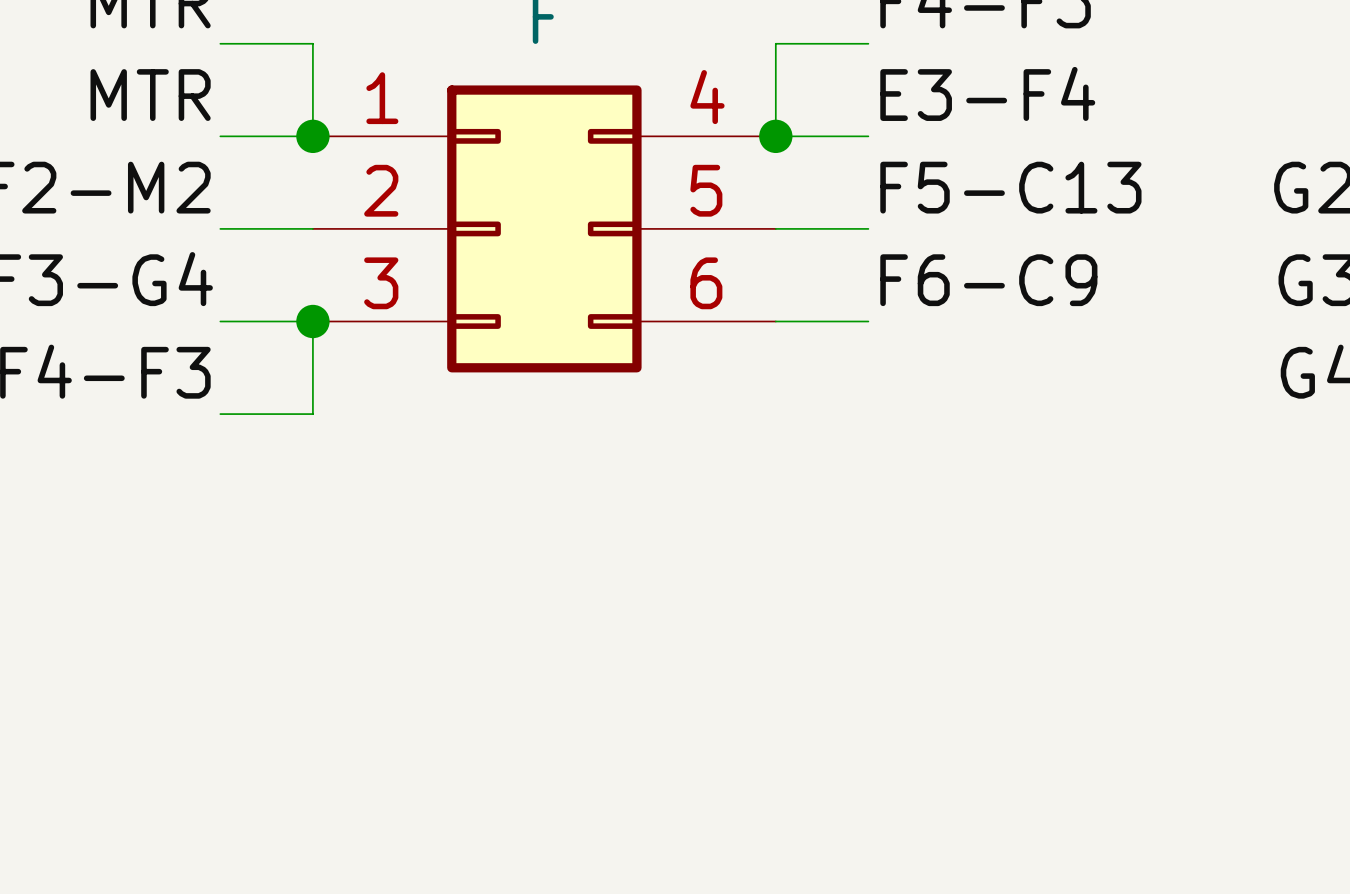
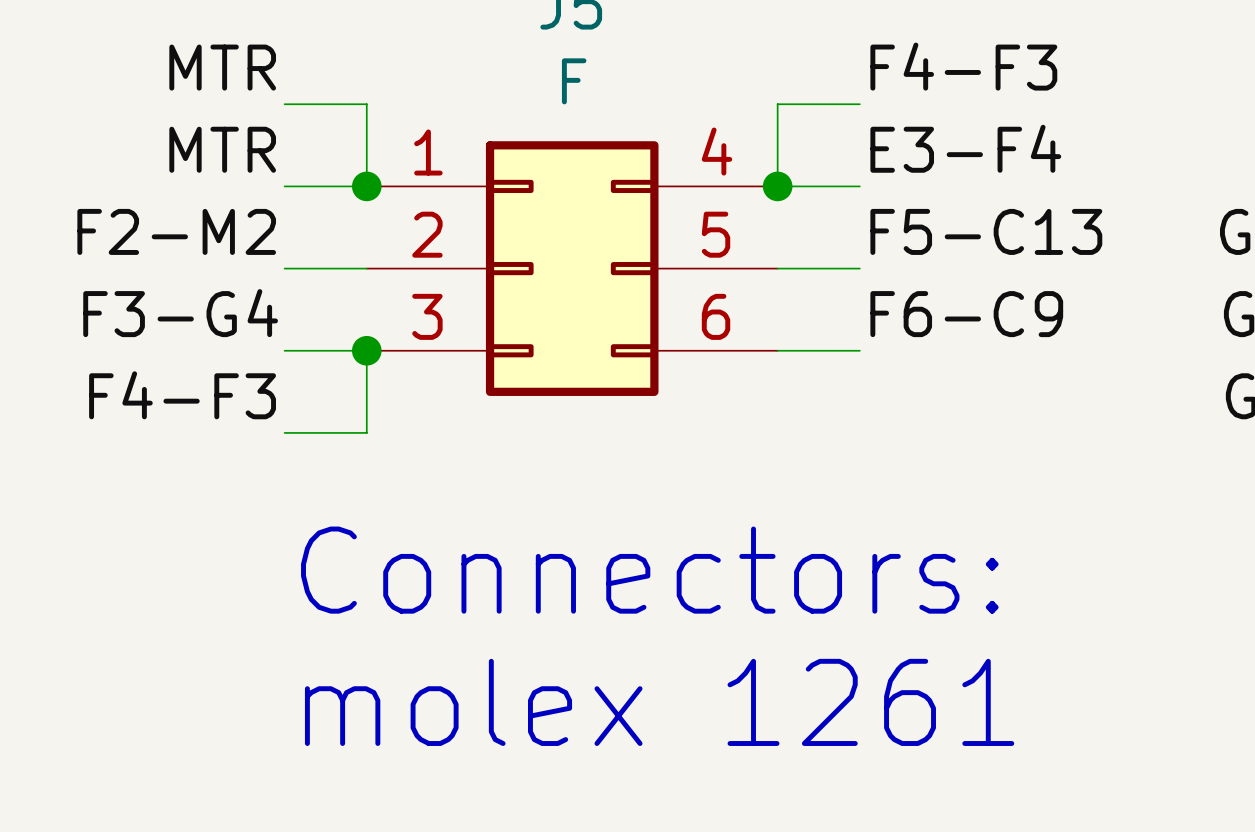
text: none -> Connectors: (649, 570)
text: none -> molex 1261 (659, 702)

